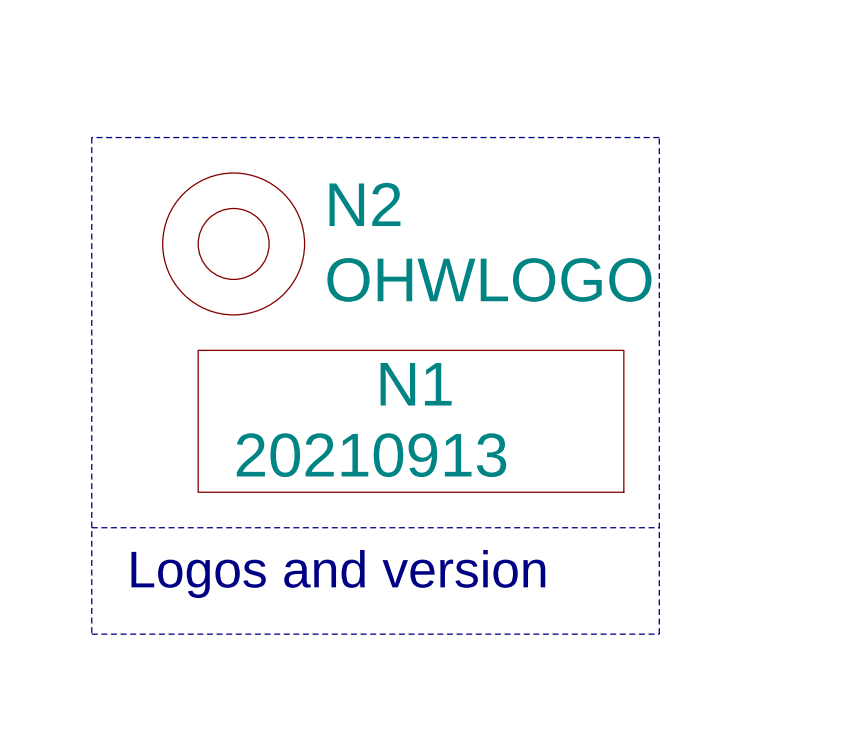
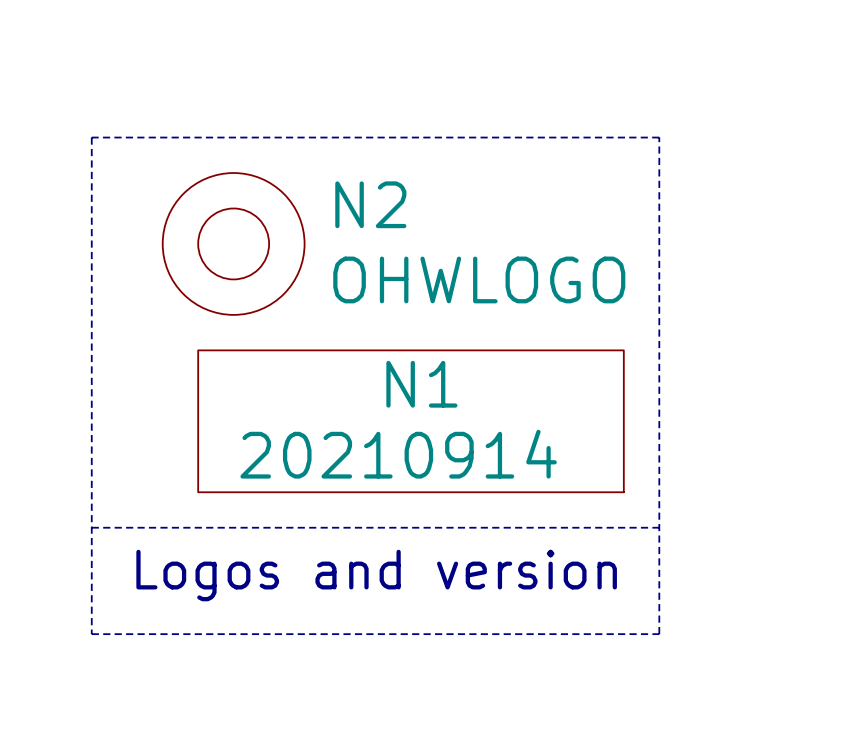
N1 value: 20210913 (371, 455) -> 20210914 (398, 454)

